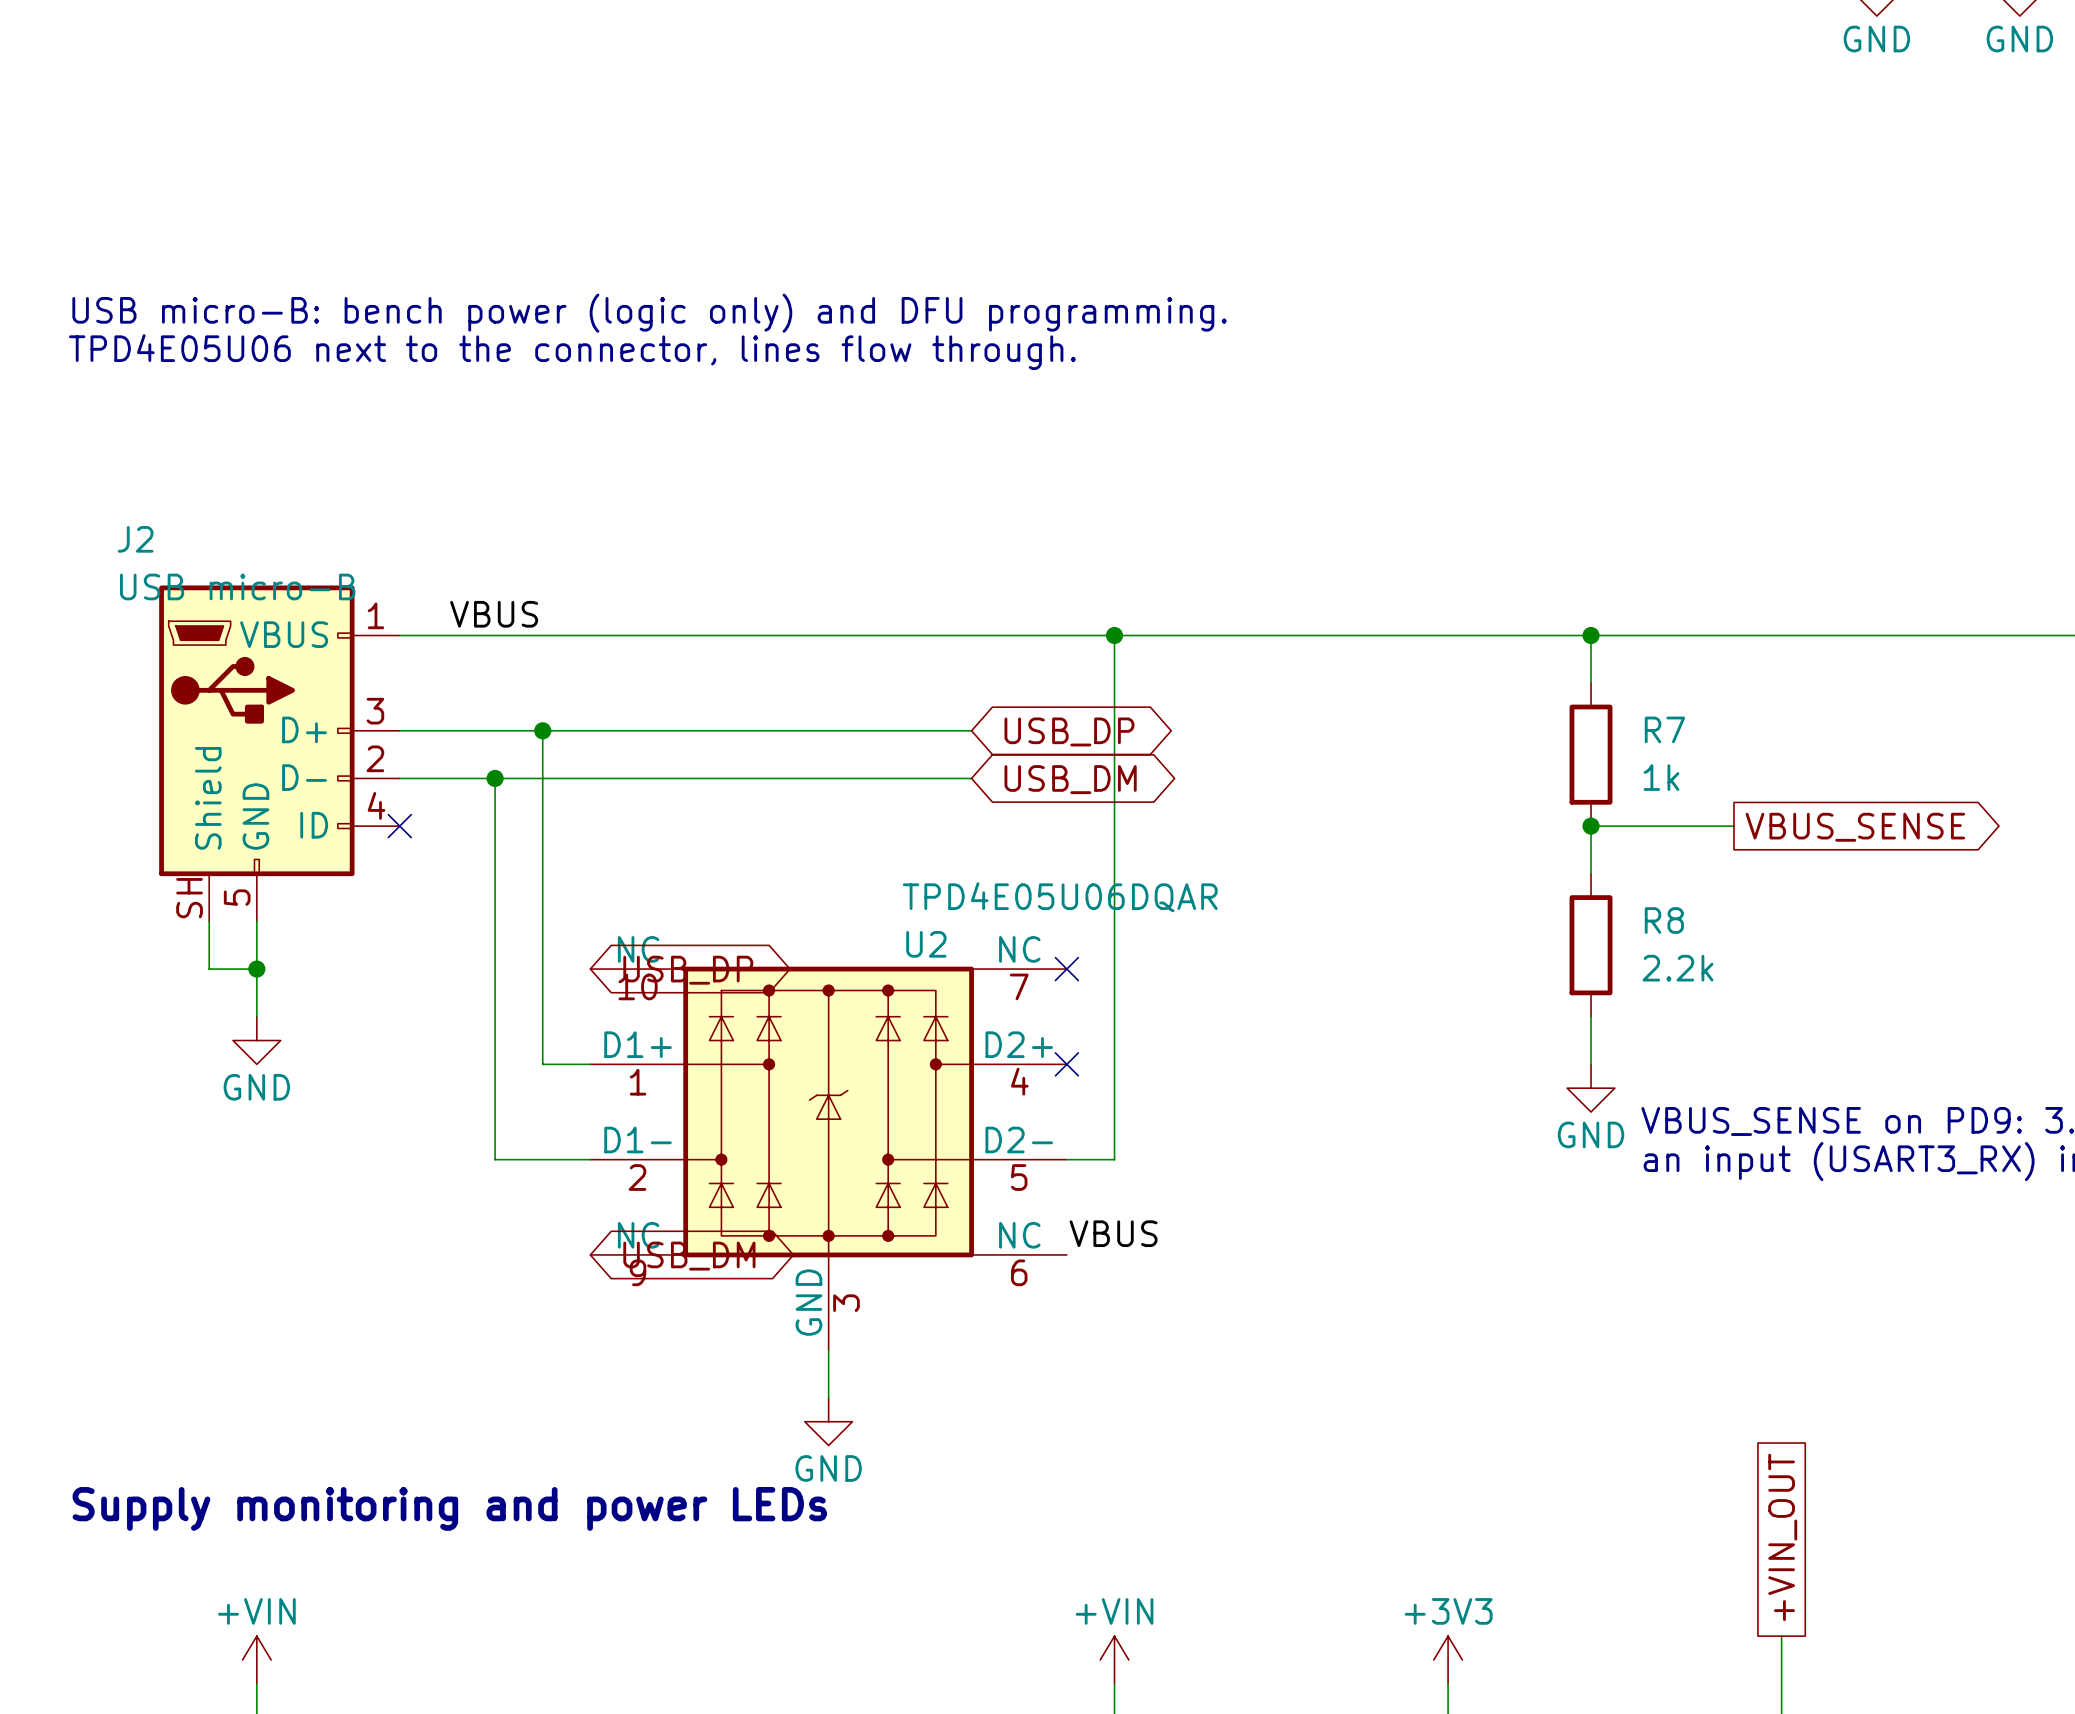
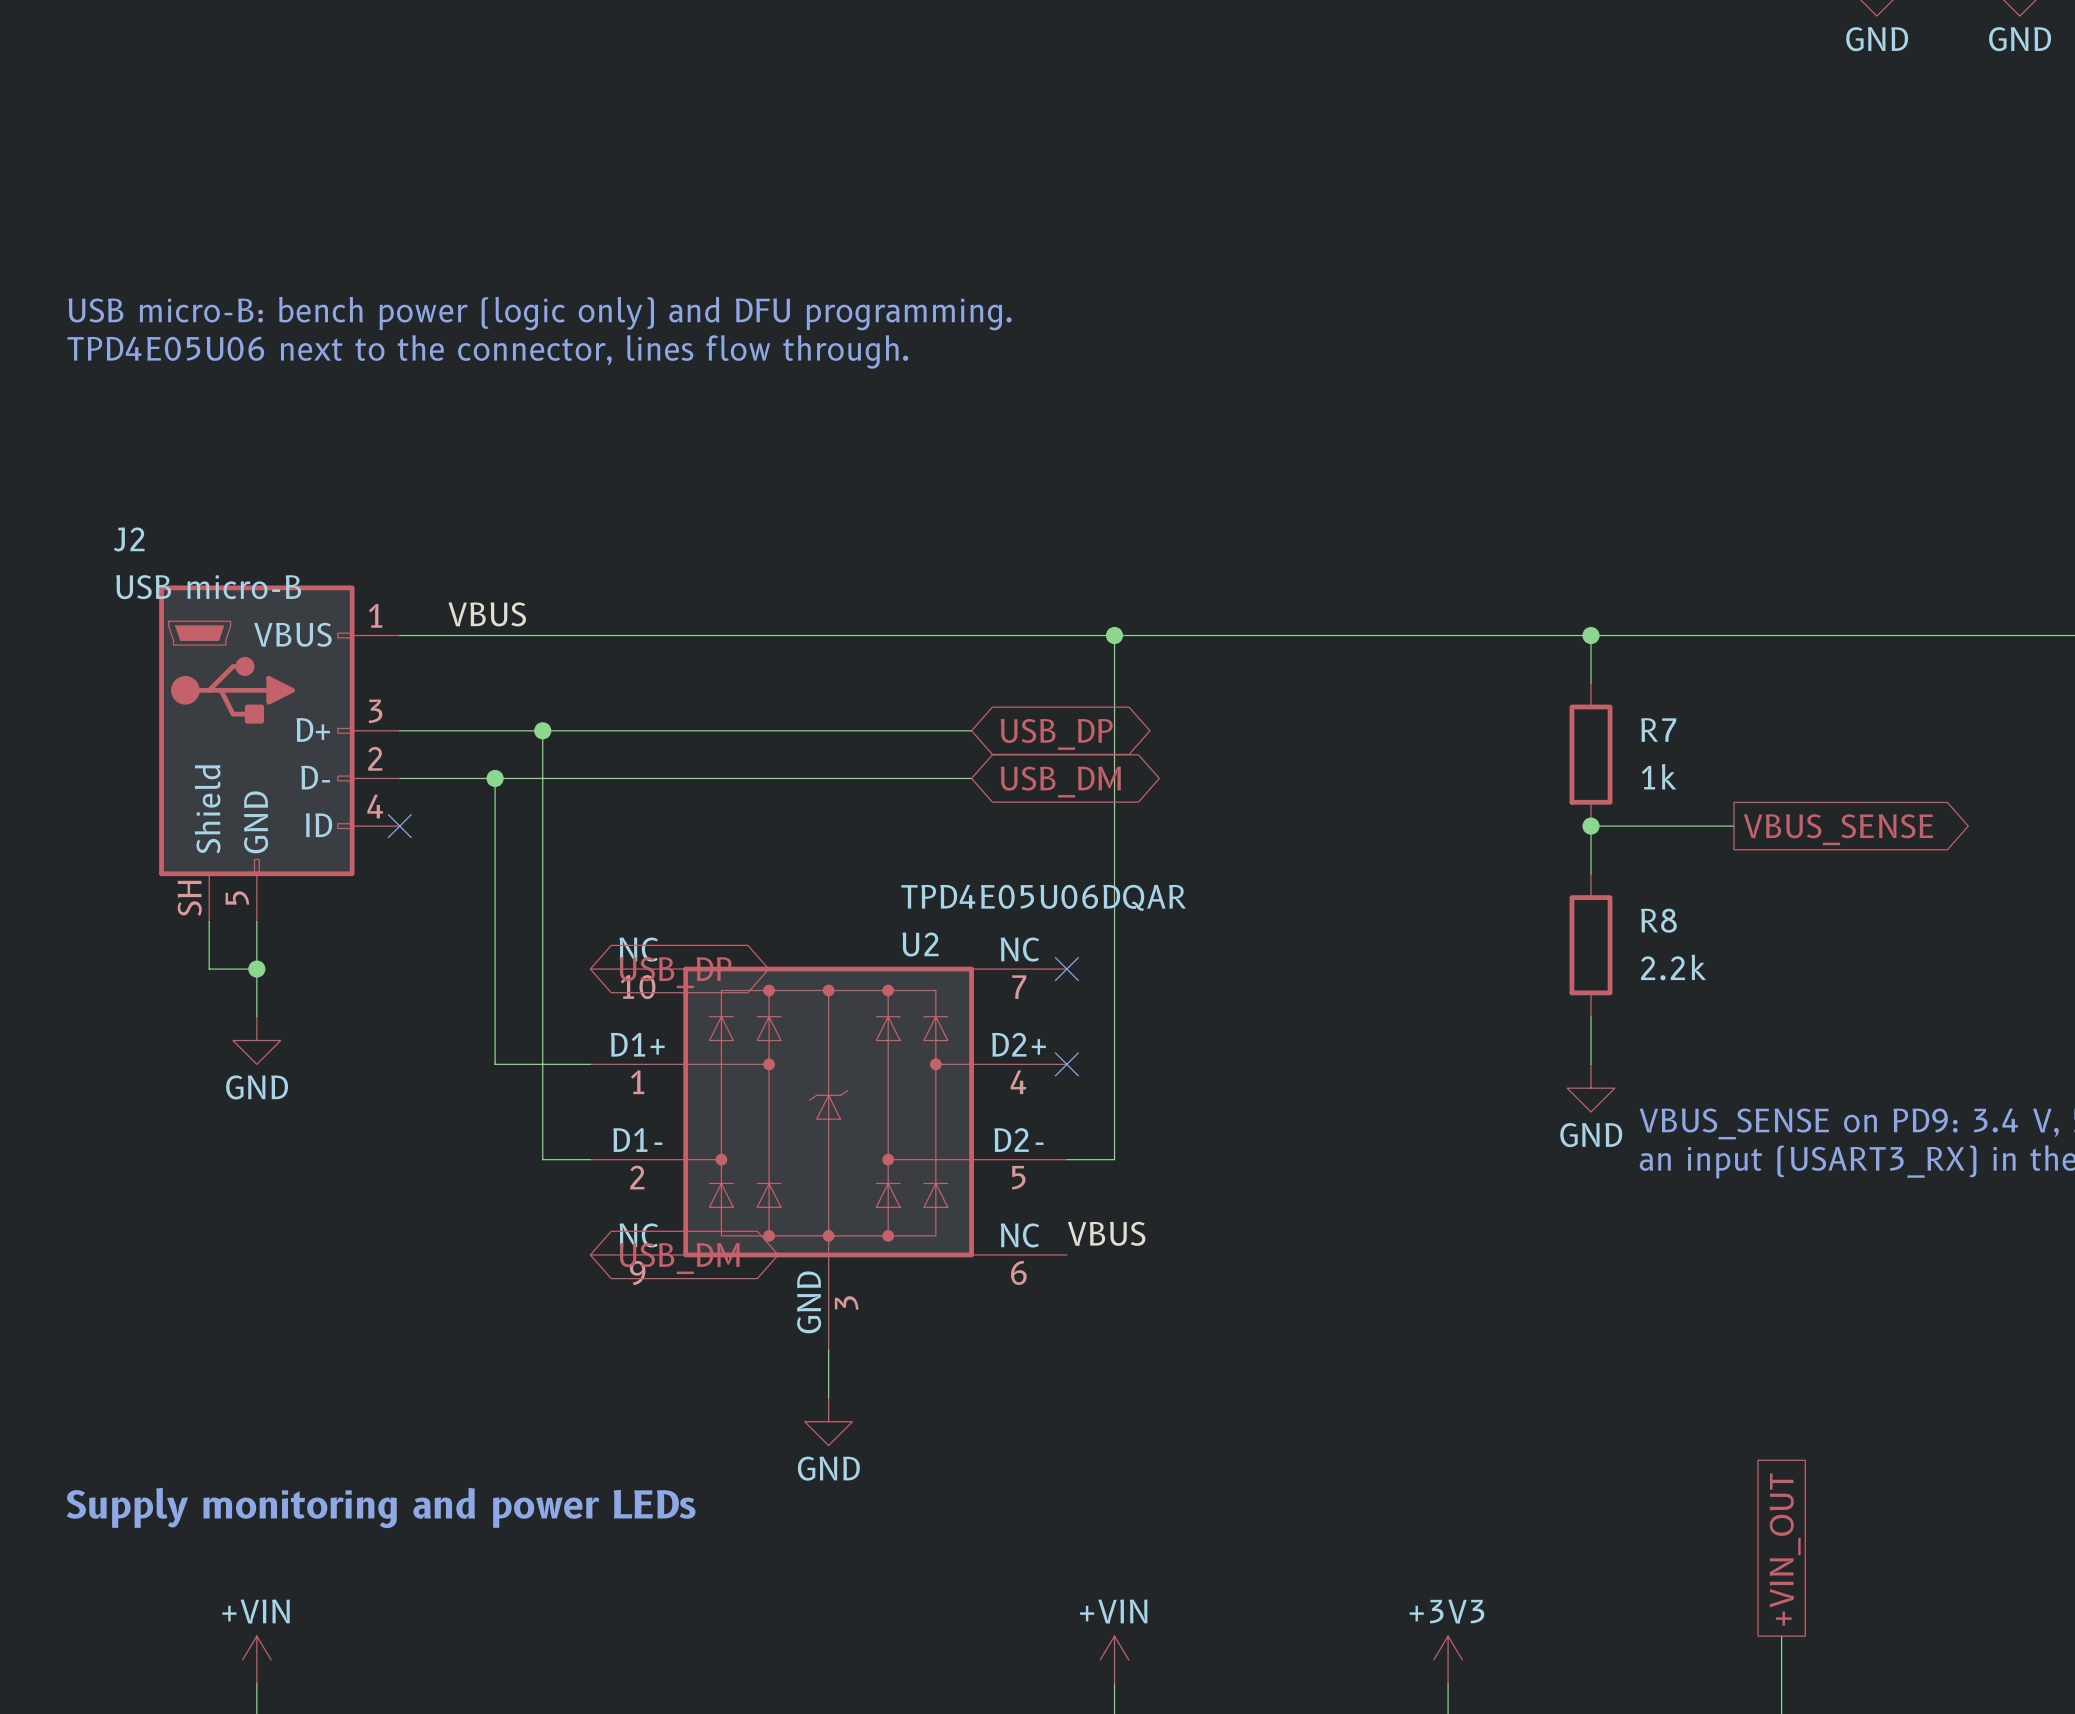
wire: (495, 1064) (495, 1159) (542, 1159) -> (495, 1064) (542, 1064) (542, 1159)

